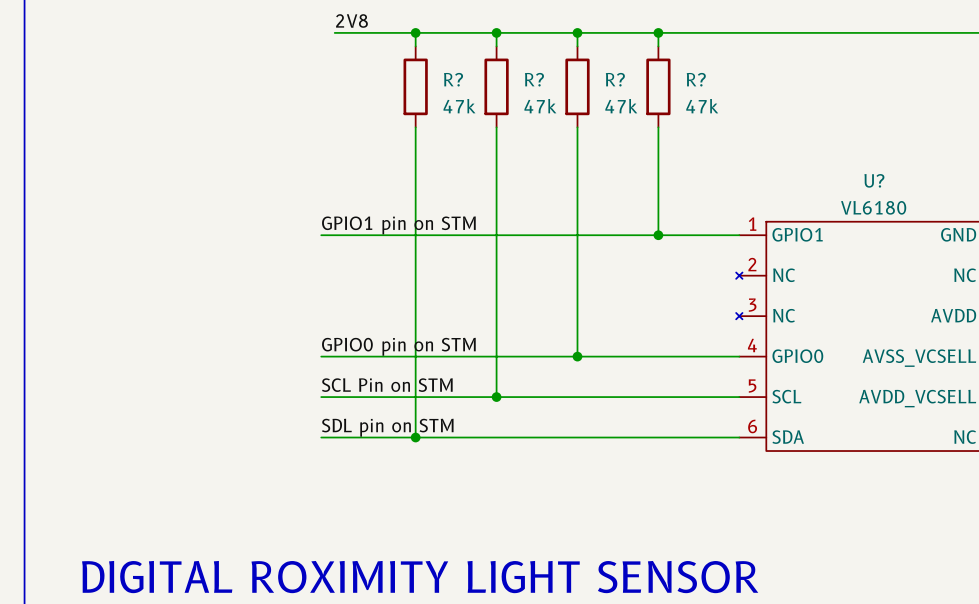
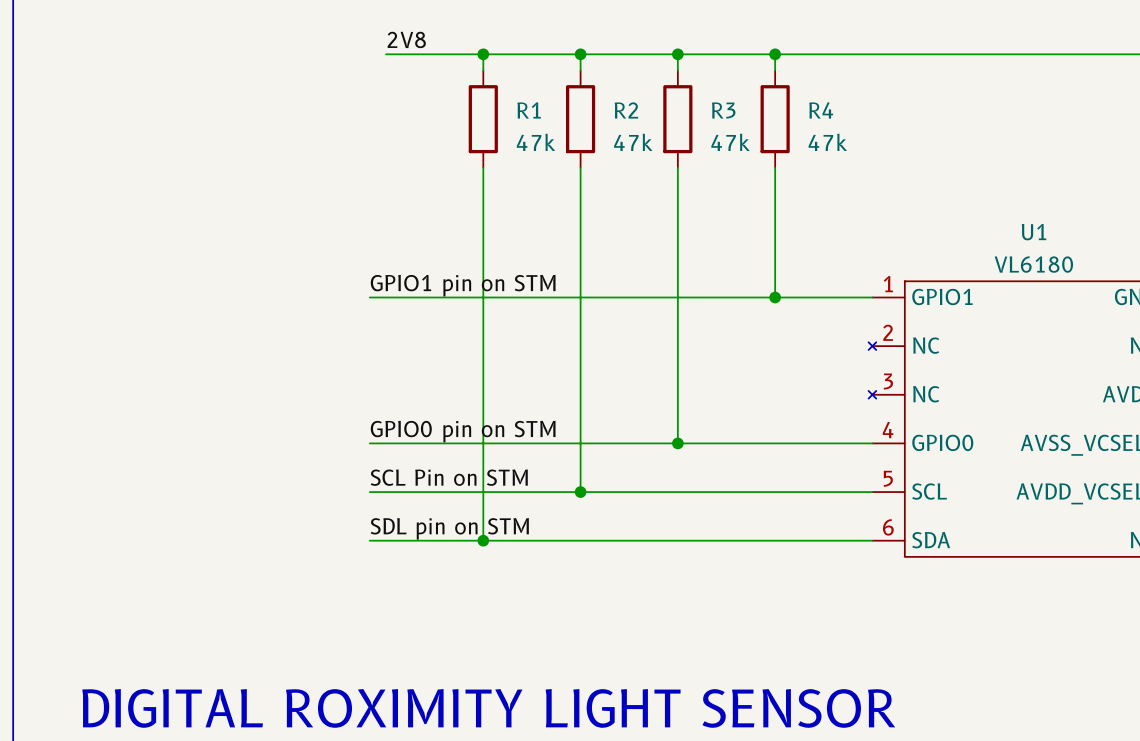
R? name: R? (453, 79) -> R1 (529, 110)
R? name: R? (534, 79) -> R2 (626, 110)
R? name: R? (615, 79) -> R3 (723, 110)
R? name: R? (696, 79) -> R4 (821, 110)
U? name: U? (874, 180) -> U1 (1034, 232)

